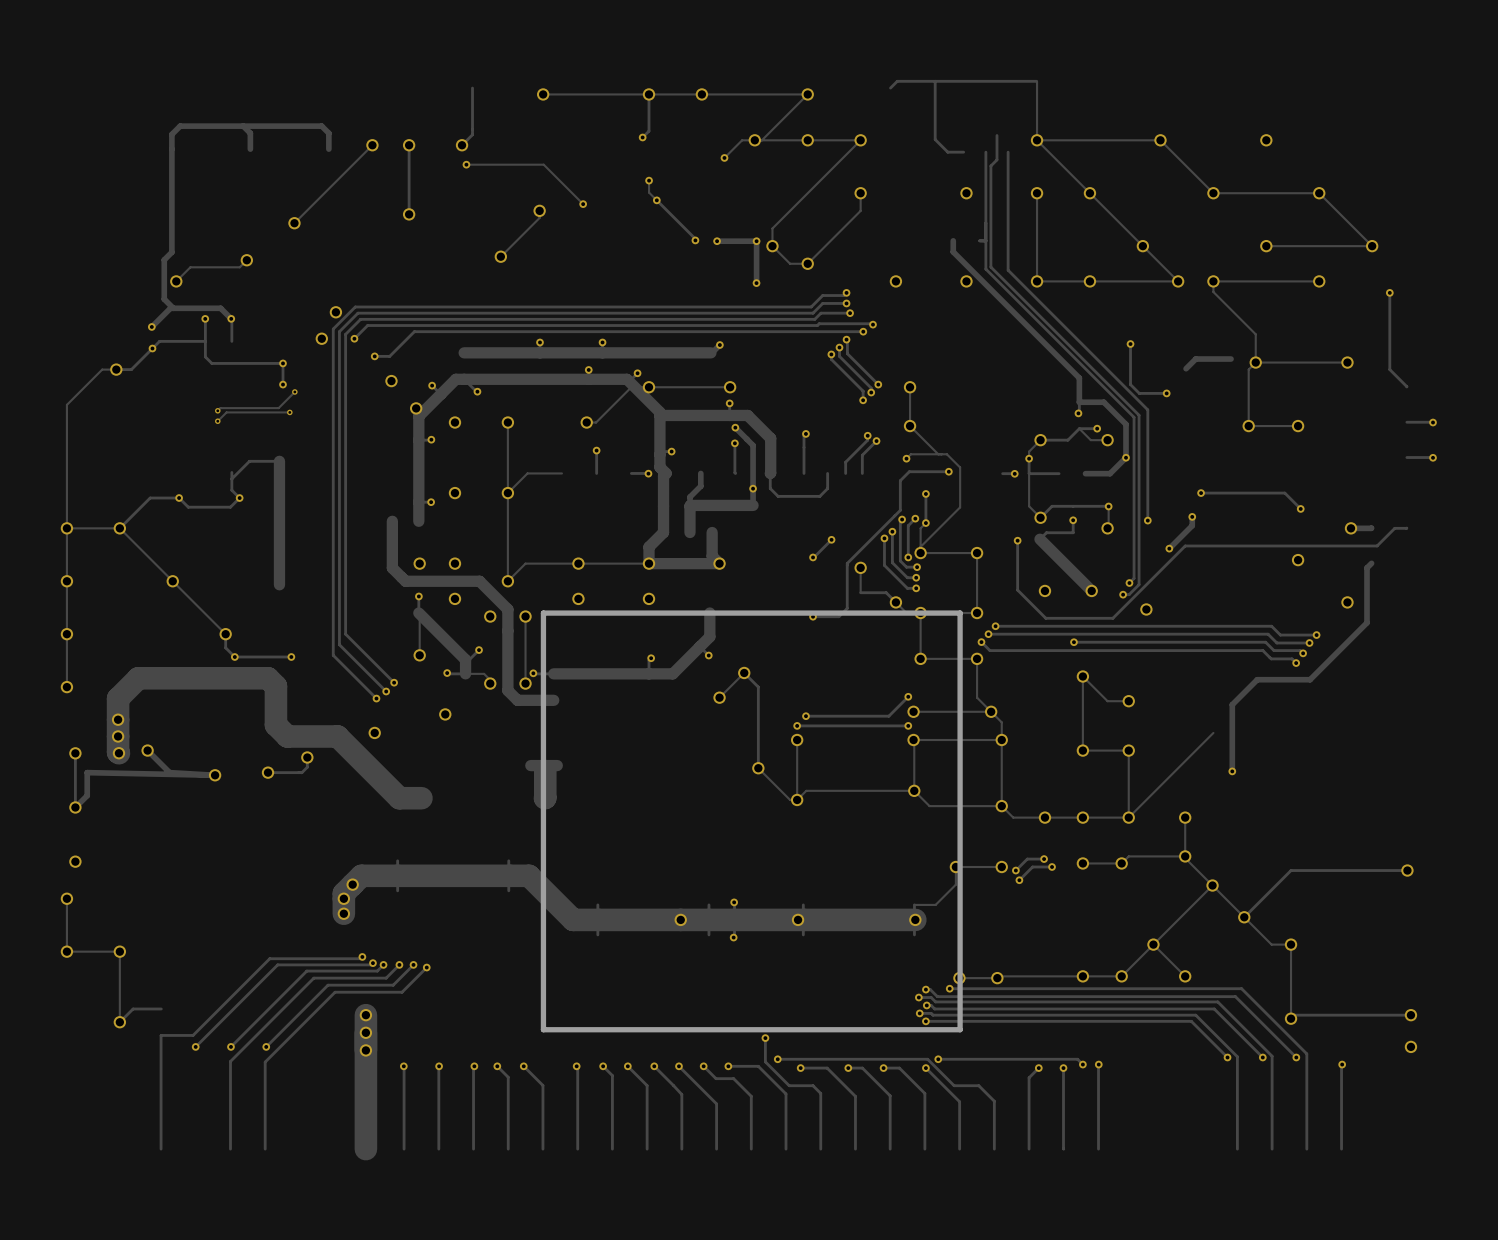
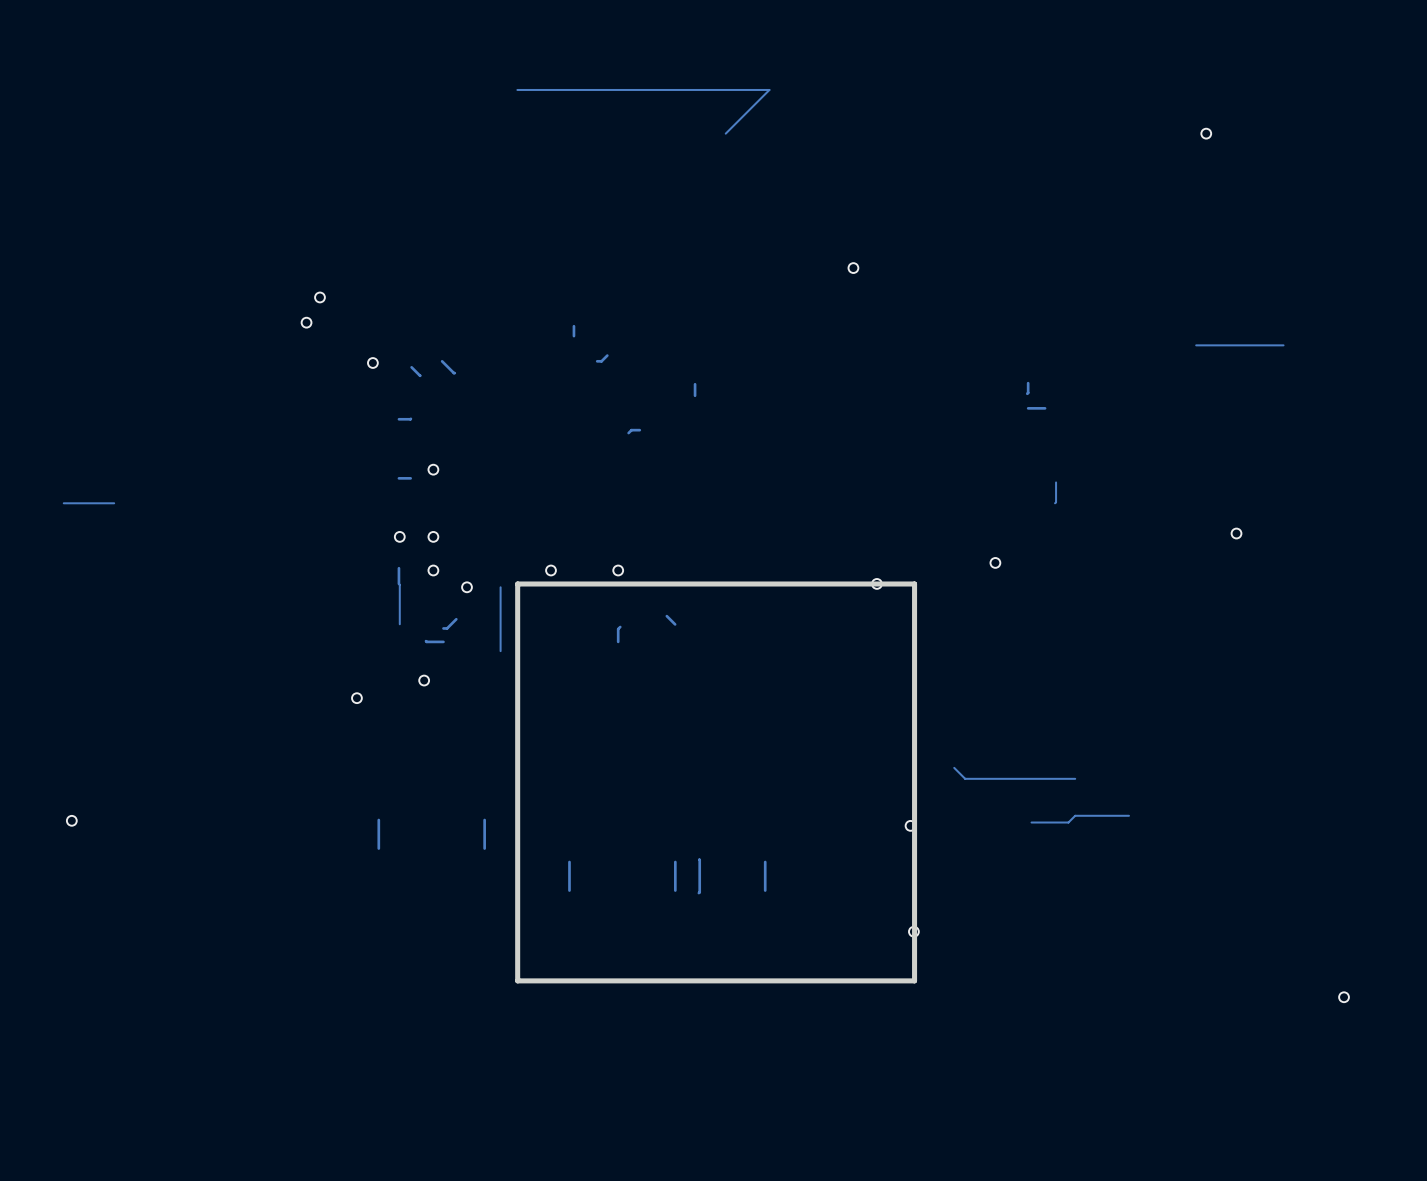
track: (935, 81) (935, 139) (947, 152) (963, 152) -> none
track: (472, 88) (472, 134) (462, 145) -> none
track: (890, 88) (897, 81) (1036, 81) (1037, 140) -> none
via: (543, 94) -> none
track: (648, 94) (648, 131) (642, 137) -> none
via: (648, 94) -> none
via: (701, 94) -> none
via: (807, 94) -> none
track: (243, 126) (250, 133) (250, 149) -> none
track: (997, 135) (997, 159) (990, 165) (990, 267) (1139, 415) (1139, 584) (1129, 594) (1123, 594) -> none
via: (642, 137) -> none
via: (754, 140) -> none
via: (807, 140) -> none
via: (860, 140) -> none
track: (1037, 140) (1160, 140) (1213, 193) (1319, 193) (1372, 246) (1266, 246) -> none
track: (1037, 140) (1178, 281) (1037, 281) (1037, 193) -> none
via: (1037, 140) -> none
via: (1160, 140) -> none
track: (372, 145) (294, 223) -> none
via: (372, 145) -> none
track: (409, 145) (409, 214) -> none
via: (409, 145) -> none
via: (462, 145) -> none
track: (328, 149) (328, 133) (321, 126) (180, 126) (171, 134) (171, 252) (164, 259) (164, 299) (173, 308) -> none
track: (985, 152) (985, 269) (1134, 417) (1134, 578) (1129, 583) -> none
track: (1008, 152) (1008, 270) (1147, 409) (1147, 520) -> none
track: (724, 157) (742, 140) (860, 140) (772, 228) (772, 246) (790, 263) (807, 263) (860, 210) (860, 193) -> none
via: (724, 157) -> none
track: (466, 164) (543, 164) (583, 204) -> none
via: (466, 164) -> none
track: (649, 180) (649, 192) (695, 240) -> none
via: (649, 180) -> none
via: (860, 193) -> none
via: (966, 193) -> none
via: (1037, 193) -> none
via: (1089, 193) -> none
via: (1213, 193) -> none
via: (1319, 193) -> none
via: (656, 200) -> none
via: (583, 204) -> none
track: (539, 210) (539, 217) (500, 256) -> none
via: (539, 210) -> none
via: (409, 214) -> none
via: (294, 223) -> none
via: (695, 240) -> none
track: (953, 240) (953, 251) (1079, 378) (1079, 402) (1103, 402) (1126, 424) (1126, 457) (1110, 473) (1085, 473) -> none
track: (985, 240) (979, 240) (985, 241) -> none
track: (717, 241) (756, 241) (756, 283) -> none
via: (717, 241) -> none
via: (756, 241) -> none
via: (772, 246) -> none
via: (1142, 246) -> none
via: (1266, 246) -> none
via: (1372, 246) -> none
via: (500, 256) -> none
track: (246, 260) (239, 267) (190, 267) (176, 281) -> none
via: (246, 260) -> none
via: (807, 263) -> none
via: (176, 281) -> none
via: (966, 281) -> none
via: (1037, 281) -> none
via: (1089, 281) -> none
via: (1178, 281) -> none
via: (1213, 281) -> none
track: (1319, 281) (1213, 281) (1213, 292) (1255, 334) (1255, 362) (1248, 369) (1248, 426) (1298, 426) -> none
via: (1319, 281) -> none
via: (756, 283) -> none
track: (846, 292) (843, 295) (822, 295) (811, 306) (355, 306) (333, 329) (333, 655) (376, 698) -> none
via: (846, 292) -> none
track: (1389, 292) (1389, 369) (1406, 386) -> none
via: (1389, 292) -> none
track: (846, 303) (822, 303) (813, 313) (357, 313) (339, 331) (339, 644) (386, 691) -> none
via: (846, 303) -> none
track: (850, 313) (820, 313) (814, 319) (360, 319) (345, 334) (345, 634) (394, 682) -> none
via: (850, 313) -> none
via: (205, 318) -> none
via: (231, 318) -> none
track: (205, 319) (205, 356) (211, 363) (283, 363) (283, 384) -> none
track: (873, 324) (367, 325) (354, 338) -> none
via: (873, 324) -> none
track: (151, 326) (170, 308) (220, 308) (231, 319) (231, 341) -> none
via: (151, 326) -> none
track: (863, 331) (414, 331) (389, 356) (374, 356) -> none
via: (863, 331) -> none
via: (354, 338) -> none
track: (846, 339) (847, 353) (878, 384) -> none
via: (846, 339) -> none
track: (205, 341) (159, 341) (131, 369) (102, 369) (66, 404) (66, 687) -> none
via: (539, 342) -> none
via: (602, 342) -> none
track: (1130, 344) (1130, 384) (1139, 393) (1166, 393) -> none
via: (1130, 344) -> none
track: (719, 345) (712, 352) (464, 352) -> none
via: (719, 345) -> none
track: (839, 347) (839, 356) (871, 388) (871, 392) -> none
via: (839, 347) -> none
via: (152, 348) -> none
track: (831, 354) (831, 359) (863, 391) (863, 400) -> none
via: (831, 354) -> none
via: (374, 356) -> none
track: (1231, 359) (1195, 359) (1186, 368) -> none
via: (1255, 362) -> none
via: (1347, 362) -> none
via: (283, 363) -> none
via: (116, 369) -> none
via: (588, 369) -> none
via: (637, 373) -> none
via: (283, 384) -> none
via: (878, 384) -> none
via: (432, 385) -> none
via: (648, 387) -> none
track: (730, 387) (631, 387) (596, 422) (586, 422) -> none
via: (730, 387) -> none
track: (910, 387) (910, 426) (938, 454) -> none
via: (910, 387) -> none
track: (294, 391) (278, 408) (220, 408) (217, 410) -> none
via: (294, 391) -> none
via: (477, 391) -> none
via: (871, 392) -> none
via: (1166, 393) -> none
via: (863, 400) -> none
via: (729, 403) -> none
via: (416, 408) -> none
via: (217, 410) -> none
track: (289, 412) (226, 412) (217, 421) -> none
via: (289, 412) -> none
via: (1078, 413) -> none
track: (659, 415) (747, 415) (770, 438) (770, 488) (778, 496) (819, 496) (827, 488) (827, 473) -> none
via: (217, 421) -> none
via: (454, 422) -> none
track: (507, 422) (507, 581) (525, 563) (648, 563) -> none
via: (507, 422) -> none
via: (586, 422) -> none
track: (1406, 422) (1433, 422) -> none
via: (1433, 422) -> none
via: (910, 426) -> none
via: (1248, 426) -> none
via: (1298, 426) -> none
track: (735, 427) (746, 439) -> none
via: (735, 427) -> none
via: (1097, 428) -> none
track: (805, 433) (804, 435) (804, 473) -> none
via: (805, 433) -> none
track: (867, 435) (867, 440) (845, 462) (845, 473) -> none
via: (867, 435) -> none
via: (431, 439) -> none
track: (746, 439) (753, 445) (753, 505) (689, 506) -> none
via: (1040, 440) -> none
track: (1107, 440) (1090, 440) (1079, 428) (1067, 440) (1040, 440) (1029, 451) (1029, 473) -> none
via: (1107, 440) -> none
track: (876, 441) (862, 455) (862, 473) -> none
via: (876, 441) -> none
track: (734, 443) (735, 473) -> none
via: (734, 443) -> none
track: (596, 450) (596, 473) -> none
via: (596, 450) -> none
via: (671, 451) -> none
via: (1126, 457) -> none
track: (1406, 457) (1433, 457) -> none
via: (1433, 457) -> none
track: (906, 458) (910, 454) (946, 454) (960, 467) (960, 507) (920, 546) -> none
via: (906, 458) -> none
via: (1029, 458) -> none
track: (948, 471) (909, 471) (900, 480) (900, 510) (847, 563) (847, 608) (838, 616) (813, 616) -> none
via: (948, 471) -> none
track: (231, 472) (231, 490) (239, 498) (230, 507) (188, 507) (179, 498) (150, 498) (119, 528) (225, 634) (225, 647) (234, 657) (291, 657) -> none
track: (561, 473) (527, 473) (507, 493) -> none
track: (631, 473) (648, 473) -> none
via: (648, 473) -> none
track: (700, 473) (700, 486) (689, 497) (689, 506) -> none
track: (1014, 473) (1002, 473) -> none
via: (1014, 473) -> none
track: (1029, 473) (1029, 506) (1040, 517) (1052, 506) (1108, 506) -> none
track: (1059, 473) (1029, 473) -> none
track: (231, 478) (249, 461) (279, 461) (279, 584) -> none
via: (753, 488) -> none
via: (507, 493) -> none
track: (925, 493) (925, 523) (920, 528) (920, 553) (977, 553) (977, 613) (906, 613) (886, 592) (860, 592) (860, 567) -> none
via: (925, 493) -> none
track: (1201, 493) (1284, 493) (1300, 508) -> none
via: (1201, 493) -> none
via: (179, 498) -> none
via: (239, 498) -> none
via: (431, 502) -> none
track: (689, 506) (689, 532) -> none
via: (1108, 506) -> none
via: (1300, 508) -> none
track: (1192, 516) (1192, 525) (1169, 548) -> none
via: (1192, 516) -> none
via: (1040, 517) -> none
track: (915, 518) (908, 525) (908, 557) -> none
via: (915, 518) -> none
track: (902, 519) (900, 521) (900, 560) (906, 567) (917, 567) -> none
via: (902, 519) -> none
track: (1073, 520) (1073, 532) (1046, 532) (1039, 539) (1091, 590) -> none
via: (1073, 520) -> none
via: (1147, 520) -> none
track: (392, 521) (392, 568) (405, 581) (479, 581) (507, 609) (507, 690) (517, 700) (553, 700) -> none
track: (418, 521) (418, 416) (455, 379) (626, 379) (659, 412) (659, 467) (666, 473) (663, 476) (663, 532) (648, 547) (648, 563) -> none
via: (925, 523) -> none
via: (66, 528) -> none
via: (119, 528) -> none
via: (1107, 528) -> none
via: (1350, 528) -> none
track: (1371, 528) (1347, 528) -> none
track: (1406, 528) (1394, 528) (1377, 545) (1185, 545) (1112, 618) (1045, 618) (1017, 590) (1017, 540) -> none
track: (892, 531) (892, 562) (907, 577) (916, 577) -> none
via: (892, 531) -> none
track: (712, 532) (712, 556) (719, 563) (648, 563) -> none
track: (884, 538) (884, 565) (907, 588) (916, 588) -> none
via: (884, 538) -> none
track: (831, 539) (813, 557) -> none
via: (831, 539) -> none
via: (1017, 540) -> none
via: (1169, 548) -> none
via: (920, 553) -> none
via: (977, 553) -> none
via: (813, 557) -> none
via: (908, 557) -> none
via: (578, 563) -> none
via: (648, 563) -> none
via: (719, 563) -> none
track: (1371, 563) (1367, 567) (1367, 622) (1310, 679) (1257, 679) (1232, 704) (1232, 771) -> none
via: (860, 567) -> none
via: (917, 567) -> none
via: (916, 577) -> none
via: (66, 581) -> none
via: (172, 581) -> none
via: (507, 581) -> none
via: (1129, 583) -> none
via: (916, 588) -> none
via: (1091, 590) -> none
via: (1123, 594) -> none
via: (418, 596) -> none
via: (895, 602) -> none
via: (1347, 602) -> none
via: (1146, 609) -> none
track: (418, 613) (465, 659) (465, 673) (484, 673) (490, 680) (490, 683) -> none
track: (709, 613) (709, 636) (672, 673) (533, 673) -> none
track: (920, 613) (920, 658) (977, 658) (977, 697) (1001, 722) (1001, 806) (929, 806) (914, 790) -> none
via: (977, 613) -> none
via: (525, 616) -> none
via: (813, 616) -> none
track: (995, 626) (1271, 626) (1280, 635) (1316, 635) -> none
via: (995, 626) -> none
via: (66, 634) -> none
via: (225, 634) -> none
track: (988, 634) (1268, 634) (1276, 643) (1309, 643) -> none
via: (988, 634) -> none
via: (1316, 635) -> none
track: (981, 642) (989, 650) (1262, 650) (1271, 658) (1292, 658) (1296, 663) -> none
via: (981, 642) -> none
track: (1073, 642) (1265, 642) (1273, 650) (1300, 650) (1303, 653) -> none
via: (1073, 642) -> none
via: (1309, 643) -> none
via: (479, 650) -> none
via: (1303, 653) -> none
via: (419, 655) -> none
via: (708, 655) -> none
via: (234, 657) -> none
via: (291, 657) -> none
via: (651, 658) -> none
via: (920, 658) -> none
via: (977, 658) -> none
via: (1296, 663) -> none
via: (744, 672) -> none
via: (447, 673) -> none
via: (533, 673) -> none
via: (1082, 676) -> none
via: (394, 682) -> none
via: (490, 683) -> none
via: (525, 683) -> none
via: (66, 687) -> none
via: (386, 691) -> none
track: (908, 696) (888, 716) (805, 716) -> none
via: (908, 696) -> none
track: (719, 697) (744, 672) (758, 687) (758, 768) (790, 799) (797, 799) -> none
via: (719, 697) -> none
via: (376, 698) -> none
track: (1128, 701) (1107, 701) (1082, 676) (1082, 750) (1128, 750) (1128, 817) (1213, 732) -> none
via: (1128, 701) -> none
via: (913, 711) -> none
track: (991, 711) (913, 711) -> none
via: (991, 711) -> none
via: (805, 716) -> none
via: (118, 719) -> none
via: (797, 725) -> none
track: (908, 725) (797, 725) -> none
via: (908, 725) -> none
via: (118, 736) -> none
track: (797, 740) (797, 799) -> none
via: (797, 740) -> none
via: (913, 740) -> none
track: (1001, 740) (913, 740) (914, 790) -> none
via: (1001, 740) -> none
track: (147, 750) (169, 772) (215, 775) (87, 772) (87, 795) (75, 807) (75, 753) -> none
via: (147, 750) -> none
via: (1082, 750) -> none
via: (1128, 750) -> none
via: (75, 753) -> none
track: (118, 753) (118, 698) (138, 678) (268, 678) (275, 686) (275, 725) (287, 736) (337, 736) (399, 798) (421, 798) -> none
via: (118, 753) -> none
track: (307, 757) (307, 767) (301, 772) (268, 772) -> none
via: (307, 757) -> none
track: (545, 765) (544, 798) -> none
track: (557, 765) (530, 765) -> none
via: (758, 768) -> none
via: (1232, 771) -> none
via: (268, 772) -> none
via: (215, 775) -> none
track: (914, 790) (806, 790) (797, 799) -> none
via: (914, 790) -> none
via: (797, 799) -> none
via: (1001, 806) -> none
via: (75, 807) -> none
via: (1044, 817) -> none
via: (1082, 817) -> none
via: (1128, 817) -> none
track: (1185, 817) (1185, 858) (1271, 944) (1291, 944) (1291, 1018) (1294, 1015) (1410, 1015) -> none
via: (1185, 817) -> none
via: (1185, 856) -> none
track: (1044, 859) (1027, 859) (1015, 870) -> none
via: (1044, 859) -> none
via: (1082, 863) -> none
via: (1121, 863) -> none
track: (1001, 867) (955, 867) (955, 884) (935, 904) (914, 904) (914, 934) -> none
via: (1001, 867) -> none
track: (1052, 867) (1032, 867) (1019, 880) -> none
via: (1052, 867) -> none
via: (1015, 870) -> none
track: (1407, 870) (1291, 870) (1244, 917) -> none
via: (1407, 870) -> none
via: (1019, 880) -> none
via: (352, 884) -> none
track: (1212, 885) (1121, 976) (959, 978) -> none
via: (1212, 885) -> none
track: (66, 898) (66, 951) (119, 951) (119, 1022) (133, 1008) (161, 1008) -> none
via: (66, 898) -> none
via: (343, 898) -> none
via: (734, 902) -> none
track: (343, 913) (343, 893) (361, 875) (529, 875) (573, 919) (914, 919) -> none
via: (343, 913) -> none
via: (1244, 917) -> none
via: (680, 919) -> none
via: (798, 919) -> none
via: (915, 919) -> none
via: (733, 937) -> none
track: (1153, 944) (1185, 976) -> none
via: (1153, 944) -> none
via: (1291, 944) -> none
via: (66, 951) -> none
via: (119, 951) -> none
track: (362, 956) (360, 958) (269, 958) (193, 1035) (161, 1035) (161, 1149) -> none
via: (362, 956) -> none
track: (372, 963) (371, 964) (277, 964) (195, 1046) -> none
via: (372, 963) -> none
track: (383, 964) (377, 971) (306, 971) (230, 1046) -> none
via: (383, 964) -> none
track: (399, 964) (386, 978) (313, 978) (230, 1061) (230, 1149) -> none
via: (399, 964) -> none
track: (413, 964) (393, 985) (327, 985) (266, 1046) -> none
via: (413, 964) -> none
track: (426, 967) (402, 992) (335, 992) (265, 1062) (265, 1149) -> none
via: (426, 967) -> none
via: (1082, 976) -> none
via: (1121, 976) -> none
via: (1185, 976) -> none
via: (997, 978) -> none
track: (949, 988) (1241, 988) (1306, 1053) (1306, 1149) -> none
via: (949, 988) -> none
track: (925, 989) (930, 989) (937, 996) (1235, 996) (1296, 1057) -> none
via: (925, 989) -> none
track: (918, 997) (931, 997) (935, 1001) (1217, 1001) (1272, 1056) (1272, 1149) -> none
via: (918, 997) -> none
track: (926, 1005) (931, 1005) (934, 1008) (1214, 1008) (1262, 1057) -> none
via: (926, 1005) -> none
track: (919, 1013) (931, 1013) (932, 1015) (1195, 1015) (1237, 1056) (1237, 1149) -> none
via: (919, 1013) -> none
track: (365, 1015) (365, 1149) -> none
via: (365, 1015) -> none
via: (1410, 1015) -> none
via: (1291, 1018) -> none
track: (925, 1021) (1191, 1021) (1227, 1057) -> none
via: (925, 1021) -> none
via: (119, 1022) -> none
via: (365, 1032) -> none
track: (765, 1038) (765, 1061) (789, 1085) (813, 1085) (820, 1093) (820, 1149) -> none
via: (765, 1038) -> none
via: (195, 1046) -> none
via: (230, 1046) -> none
via: (266, 1046) -> none
via: (365, 1050) -> none
via: (1227, 1057) -> none
via: (1262, 1057) -> none
via: (1296, 1057) -> none
track: (777, 1059) (927, 1059) (954, 1085) (978, 1085) (994, 1101) (994, 1149) -> none
via: (777, 1059) -> none
track: (938, 1059) (1077, 1059) (1082, 1064) -> none
via: (938, 1059) -> none
via: (1082, 1064) -> none
track: (1098, 1064) (1098, 1149) -> none
via: (1098, 1064) -> none
track: (1342, 1064) (1341, 1149) -> none
via: (1342, 1064) -> none
track: (403, 1066) (404, 1149) -> none
via: (403, 1066) -> none
track: (439, 1066) (438, 1149) -> none
via: (439, 1066) -> none
track: (474, 1066) (473, 1149) -> none
via: (474, 1066) -> none
track: (497, 1066) (508, 1077) (508, 1149) -> none
via: (497, 1066) -> none
track: (523, 1066) (542, 1085) (542, 1149) -> none
via: (523, 1066) -> none
track: (576, 1066) (577, 1149) -> none
via: (576, 1066) -> none
track: (603, 1066) (612, 1075) (612, 1149) -> none
via: (603, 1066) -> none
track: (627, 1066) (647, 1085) (647, 1149) -> none
via: (627, 1066) -> none
track: (654, 1066) (681, 1094) (681, 1149) -> none
via: (654, 1066) -> none
track: (678, 1066) (716, 1103) (716, 1149) -> none
via: (678, 1066) -> none
track: (703, 1066) (716, 1078) (733, 1078) (751, 1096) (751, 1149) -> none
via: (703, 1066) -> none
track: (728, 1066) (758, 1066) (786, 1093) (786, 1149) -> none
via: (728, 1066) -> none
track: (800, 1068) (827, 1068) (855, 1096) (855, 1149) -> none
via: (800, 1068) -> none
track: (848, 1068) (862, 1068) (890, 1095) (890, 1149) -> none
via: (848, 1068) -> none
track: (883, 1068) (899, 1068) (924, 1093) (924, 1149) -> none
via: (883, 1068) -> none
track: (925, 1068) (959, 1101) (959, 1149) -> none
via: (925, 1068) -> none
track: (1038, 1068) (1029, 1077) (1029, 1149) -> none
via: (1038, 1068) -> none
track: (1063, 1068) (1063, 1149) -> none
via: (1063, 1068) -> none

